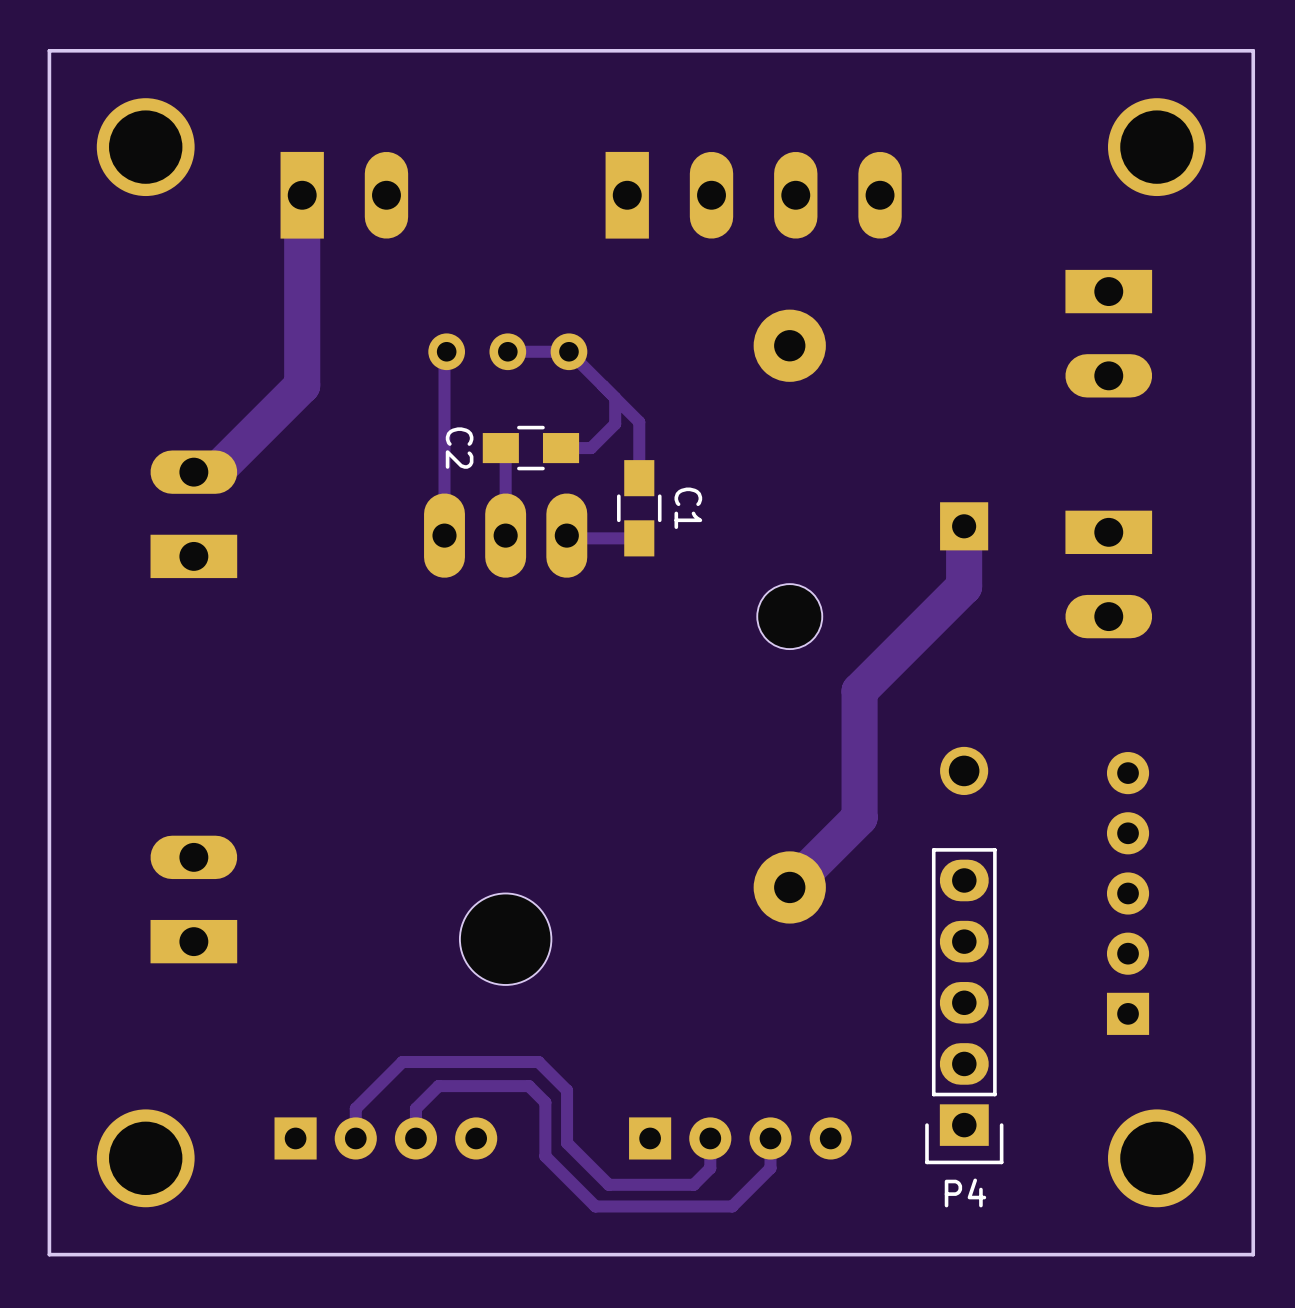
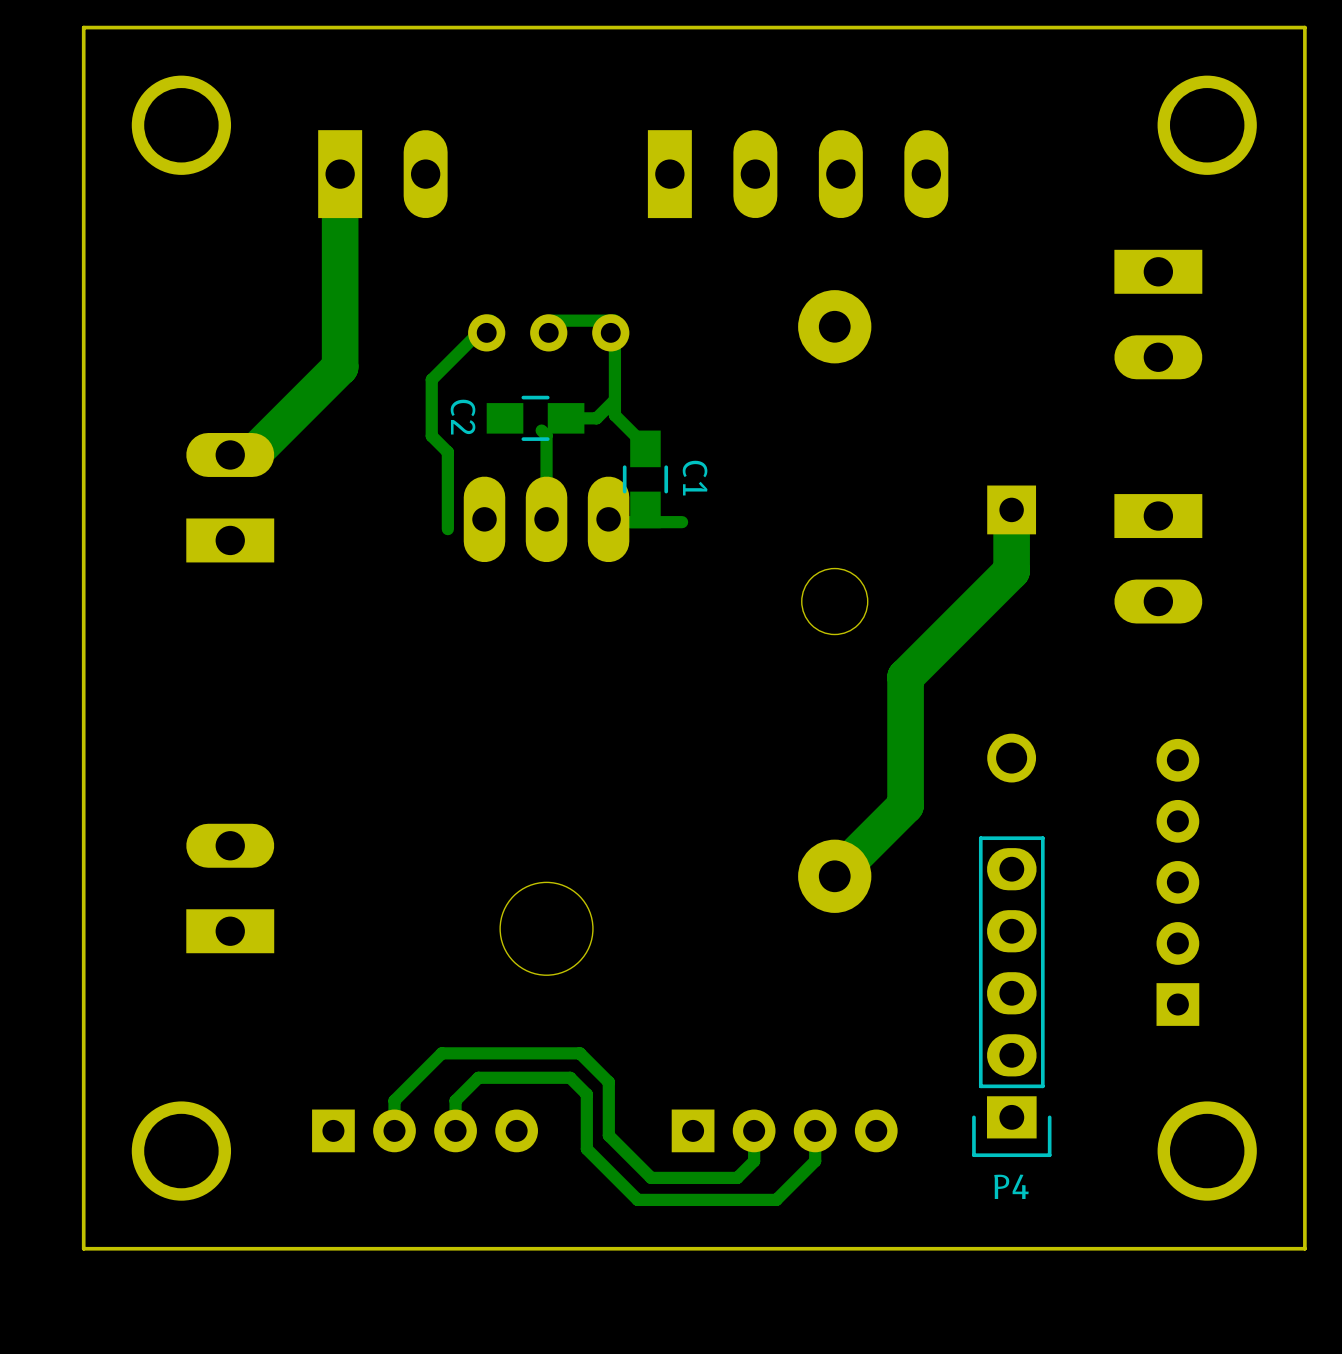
track: none -> (490, 320) (431, 379) (431, 436) (447, 452) (447, 529)
track: none -> (552, 320) (614, 320) (614, 415) (645, 445) (645, 448)
track: (446, 351) (444, 353) (444, 557) -> none
track: (507, 351) (568, 351) (639, 422) (639, 478) -> none
track: (615, 397) (615, 423) (591, 448) (561, 448) -> none
track: none -> (614, 400) (596, 418) (566, 418)
C2 position: (530, 448) -> (535, 418)
C1 position: (639, 508) -> (645, 479)

